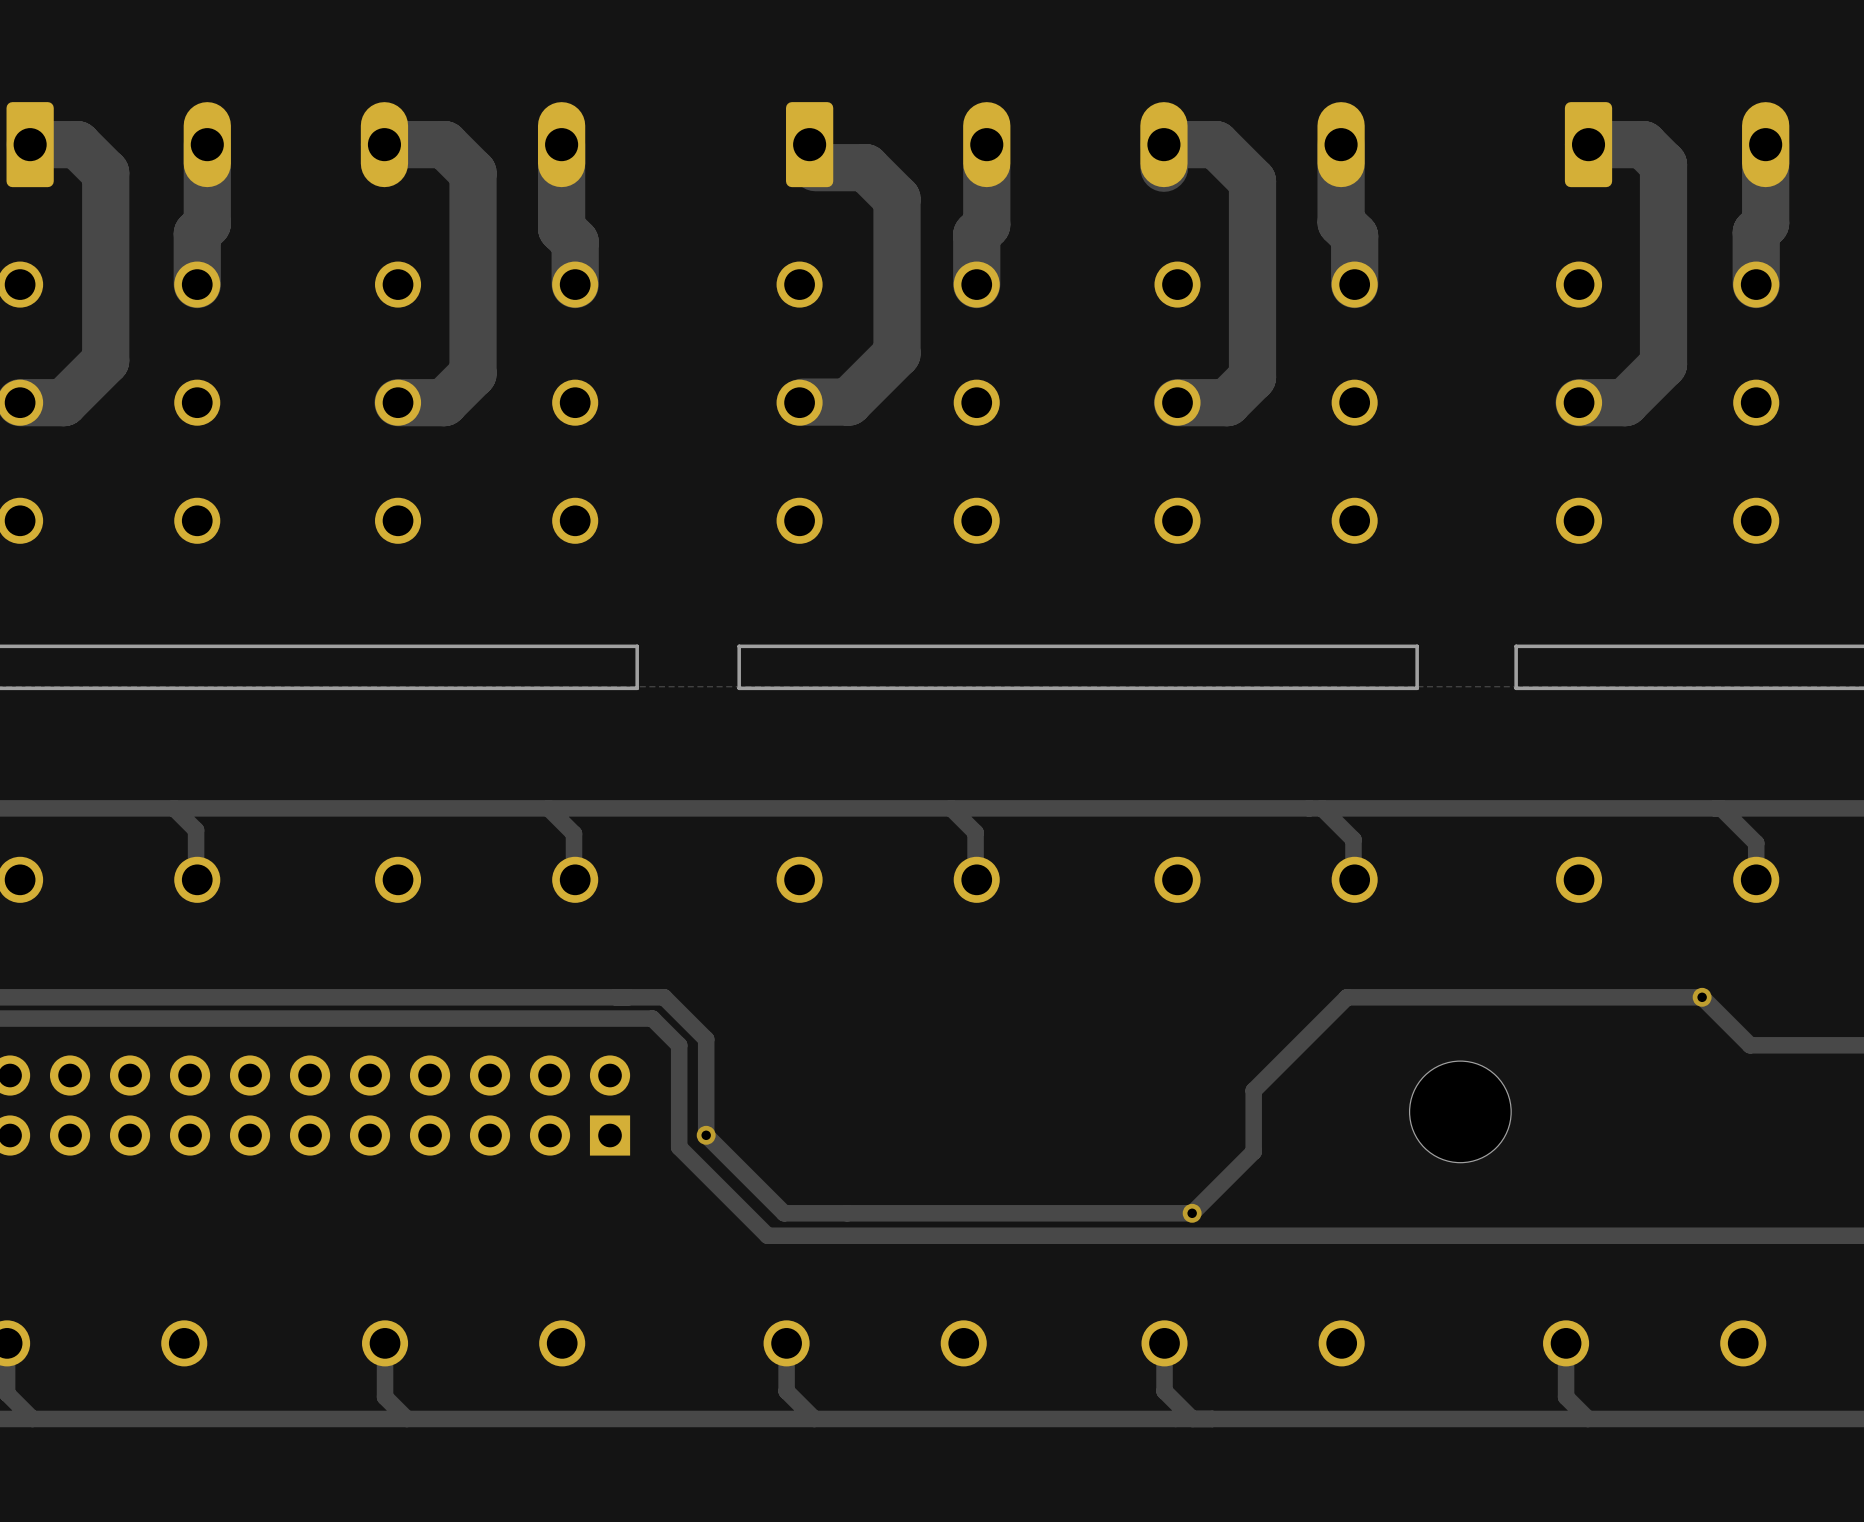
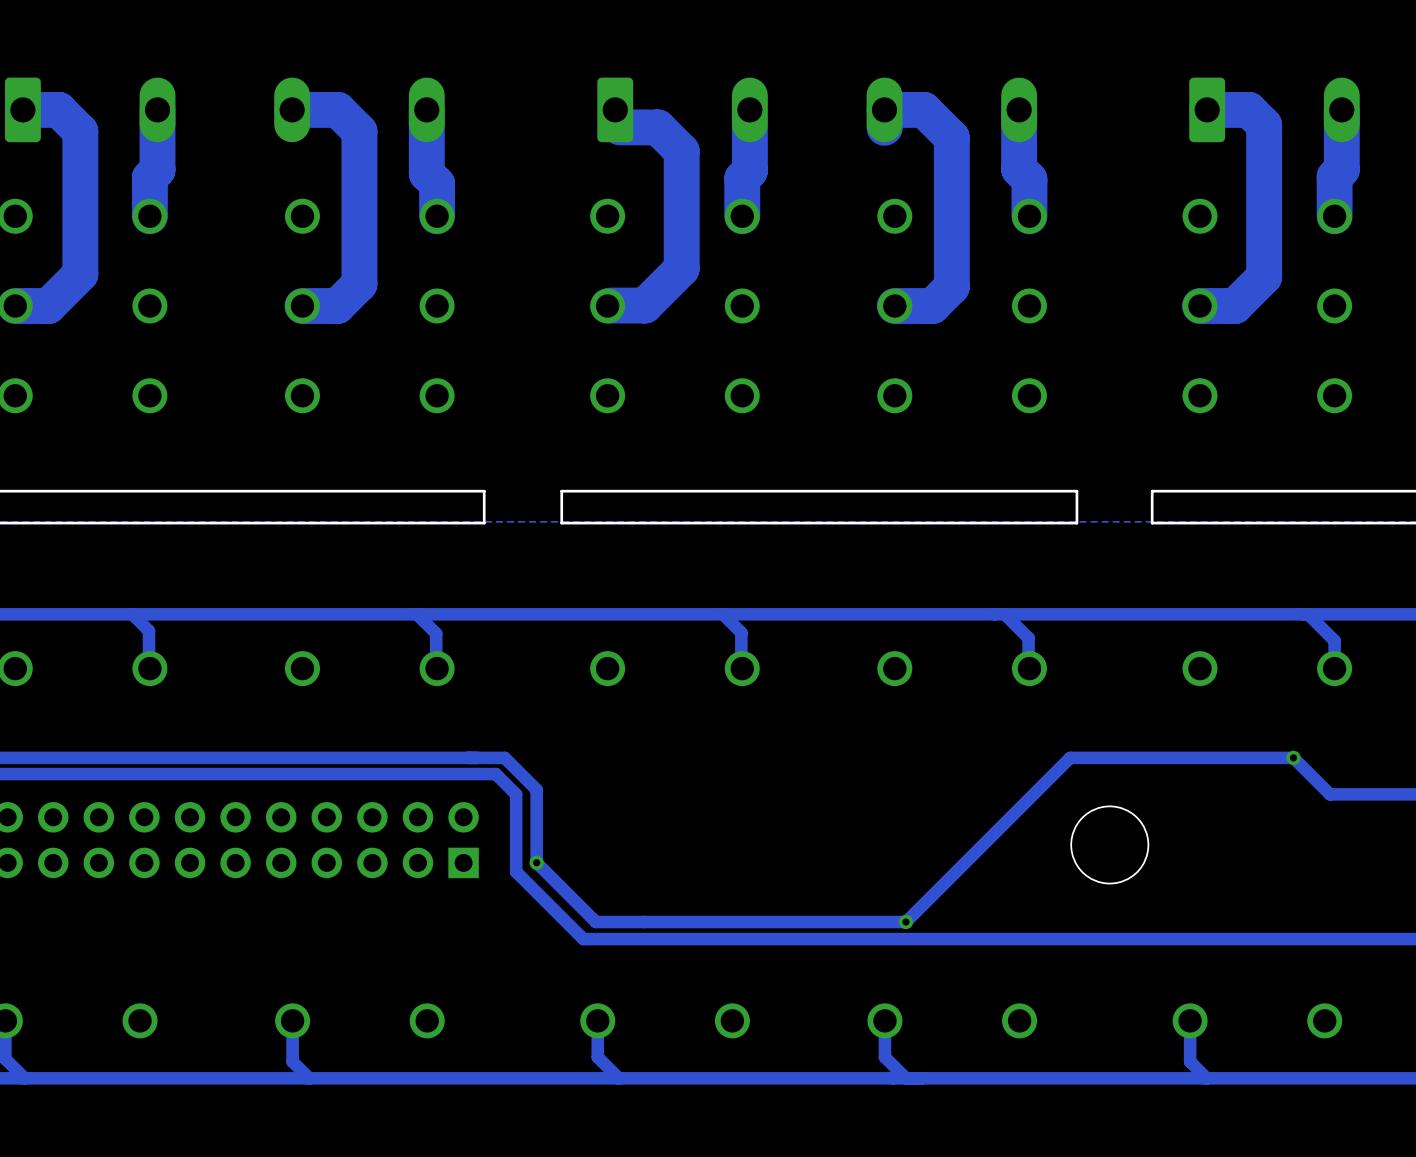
track: (1408, 997) (1347, 997) (1253, 1090) (1253, 1151) -> (1070, 757) (952, 875)

